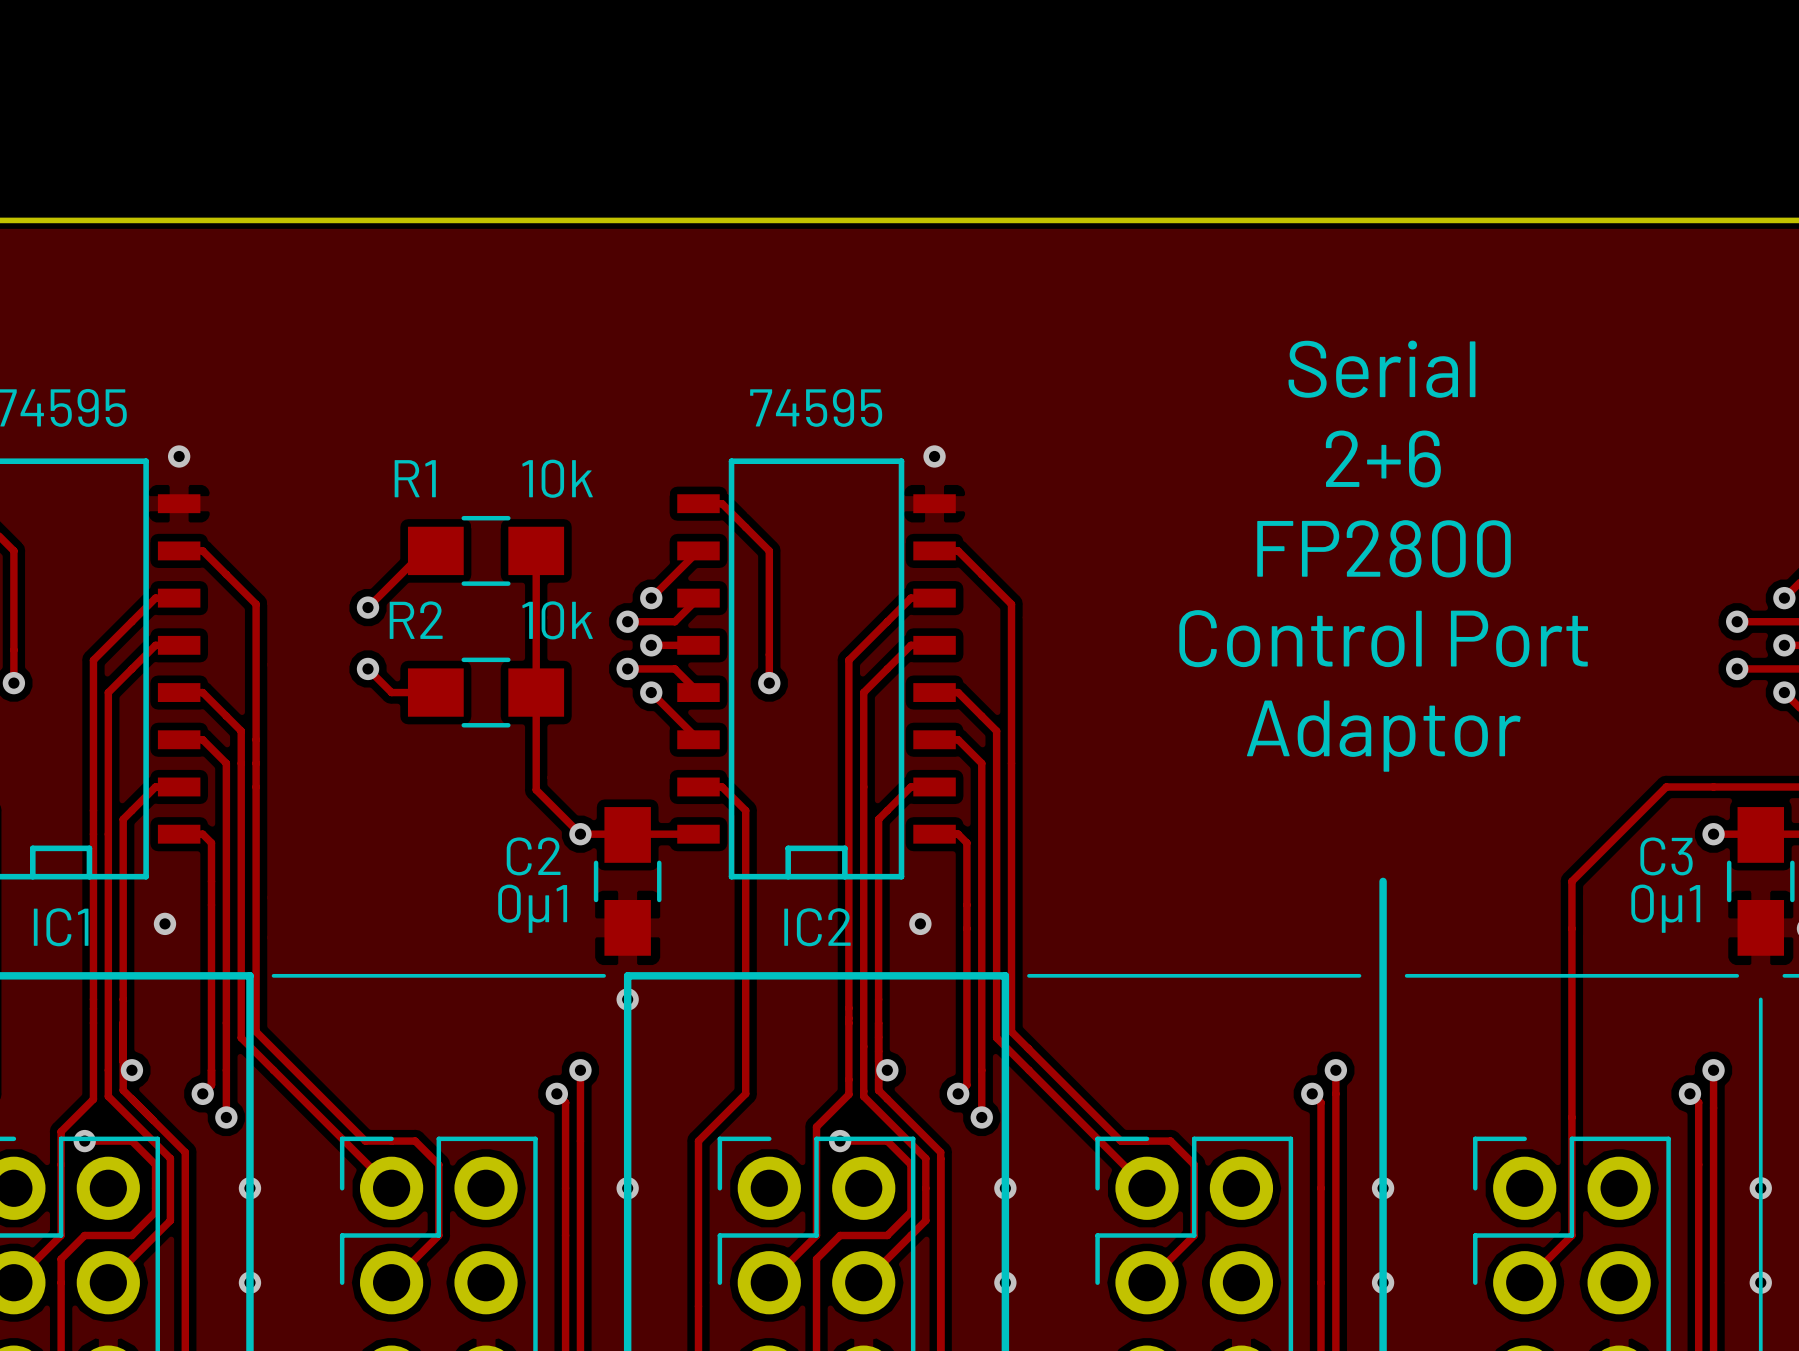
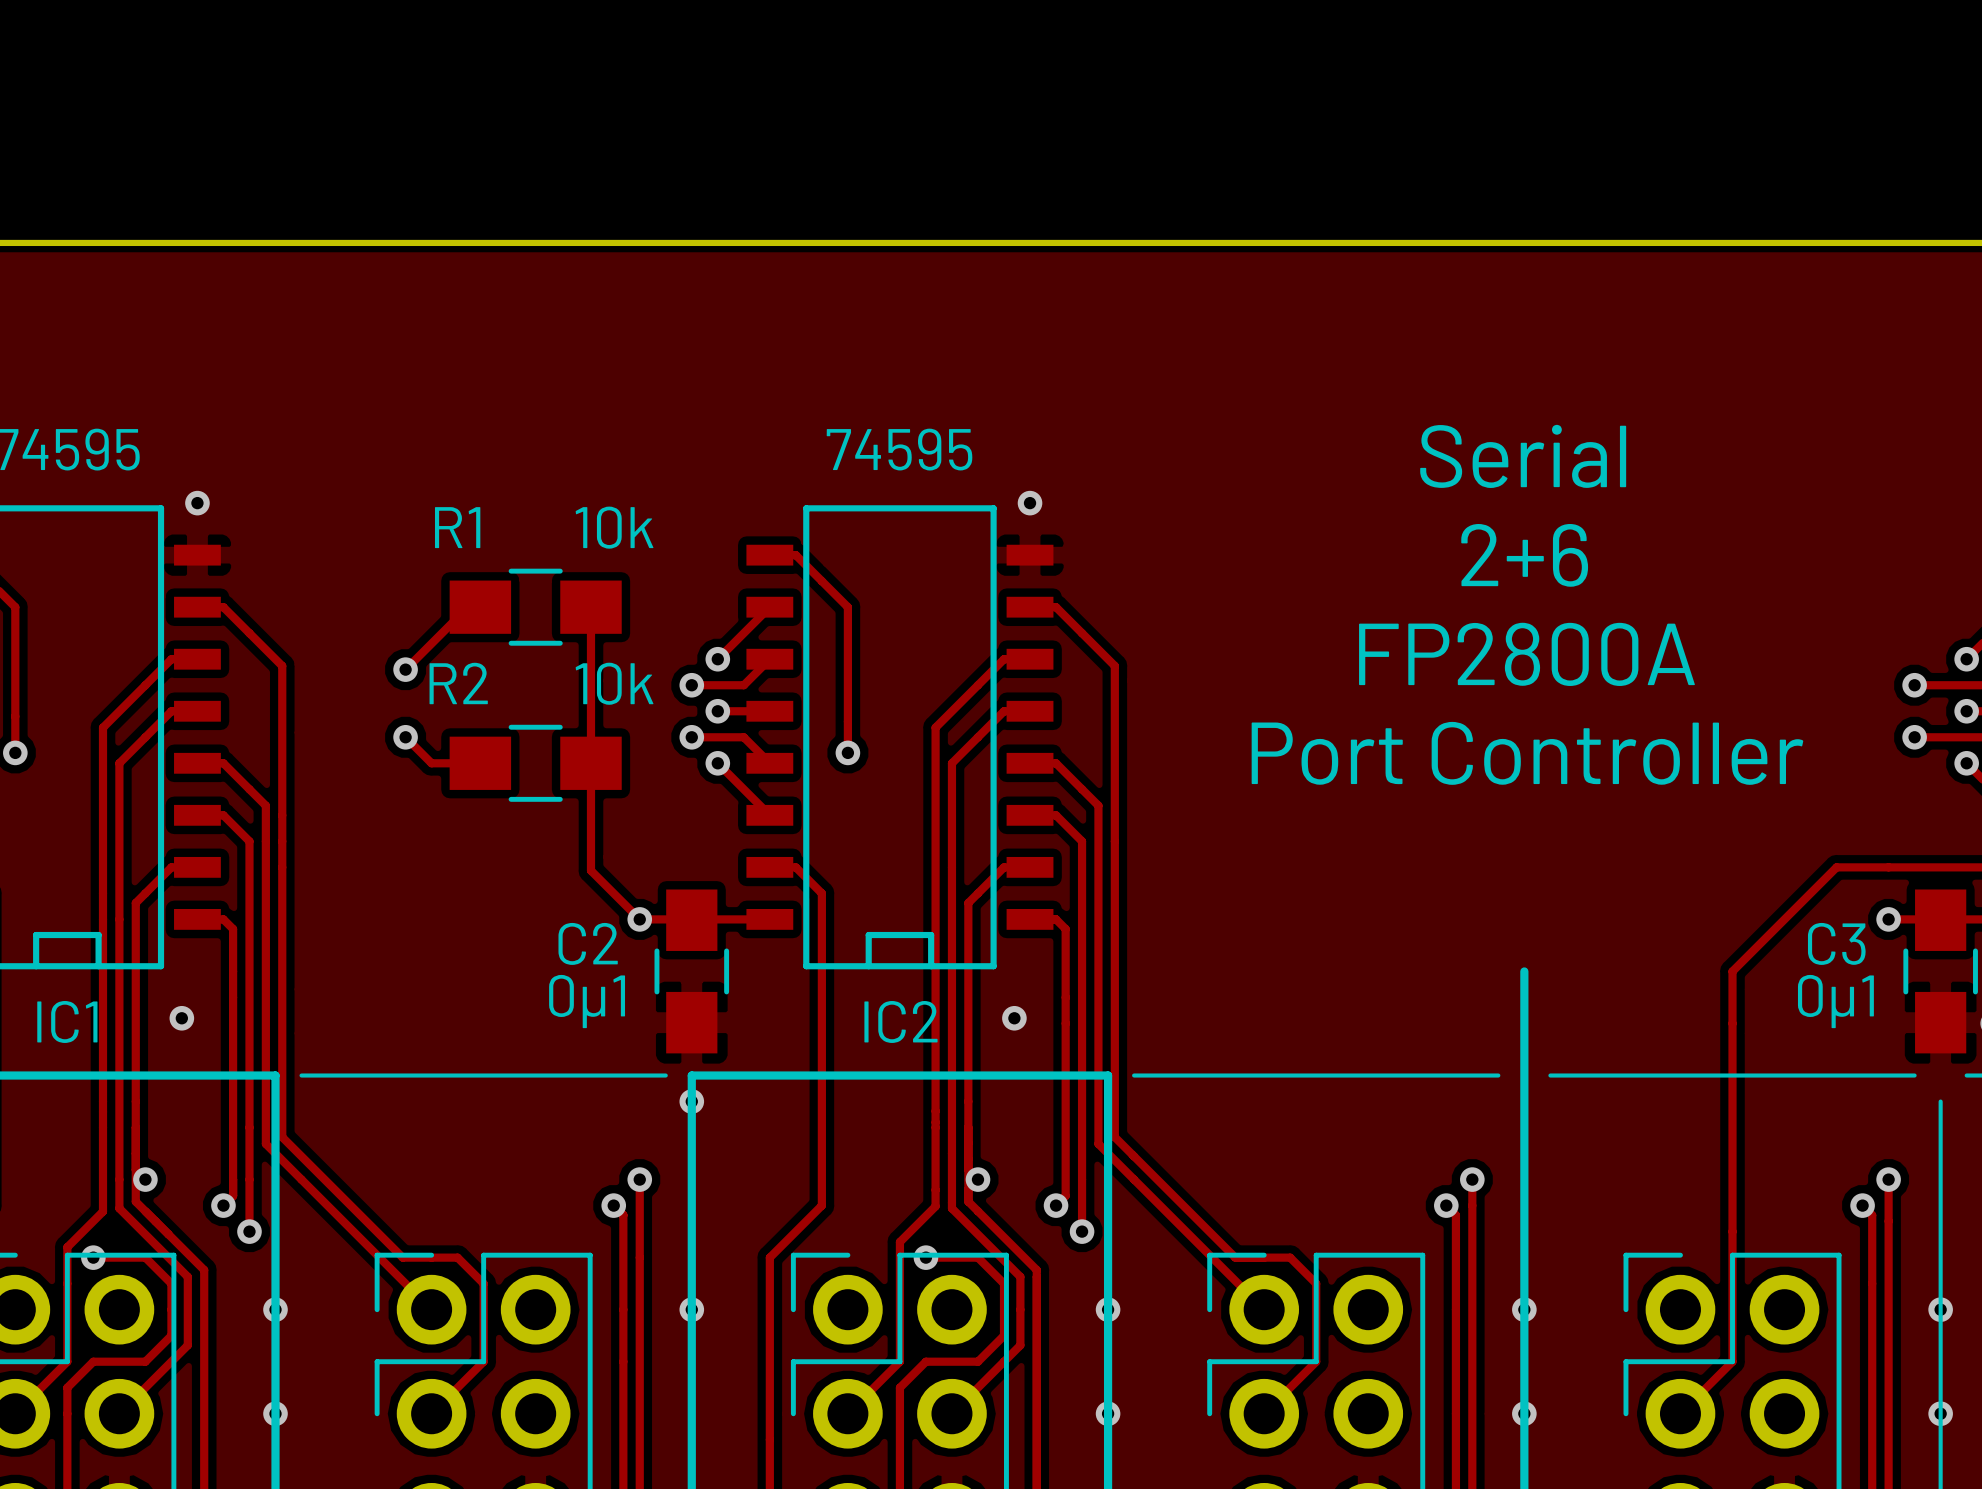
text position: Serial (1382, 369) -> Serial (1523, 456)
text position: 2+6 (1383, 459) -> 2+6 (1524, 555)
text: FP2800 (1383, 548) -> FP2800A (1526, 654)
text: Control Port (1383, 638) -> none
text: none -> Port Controller (1527, 753)
text: Adaptor (1383, 736) -> none

